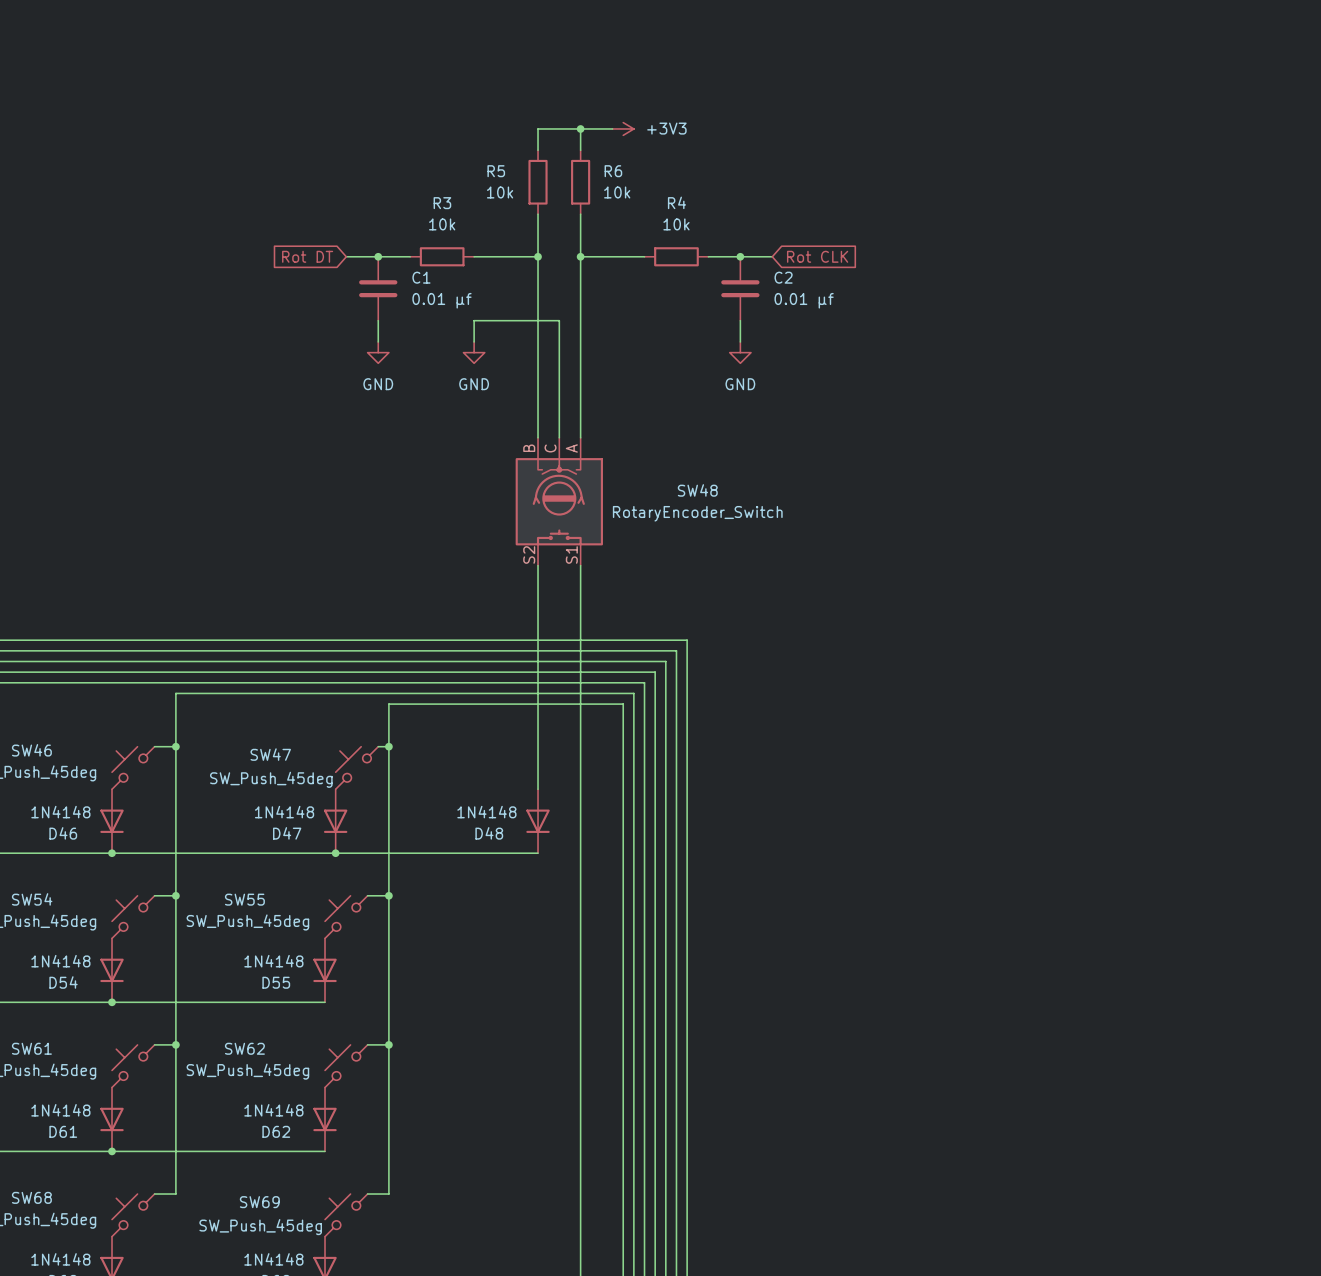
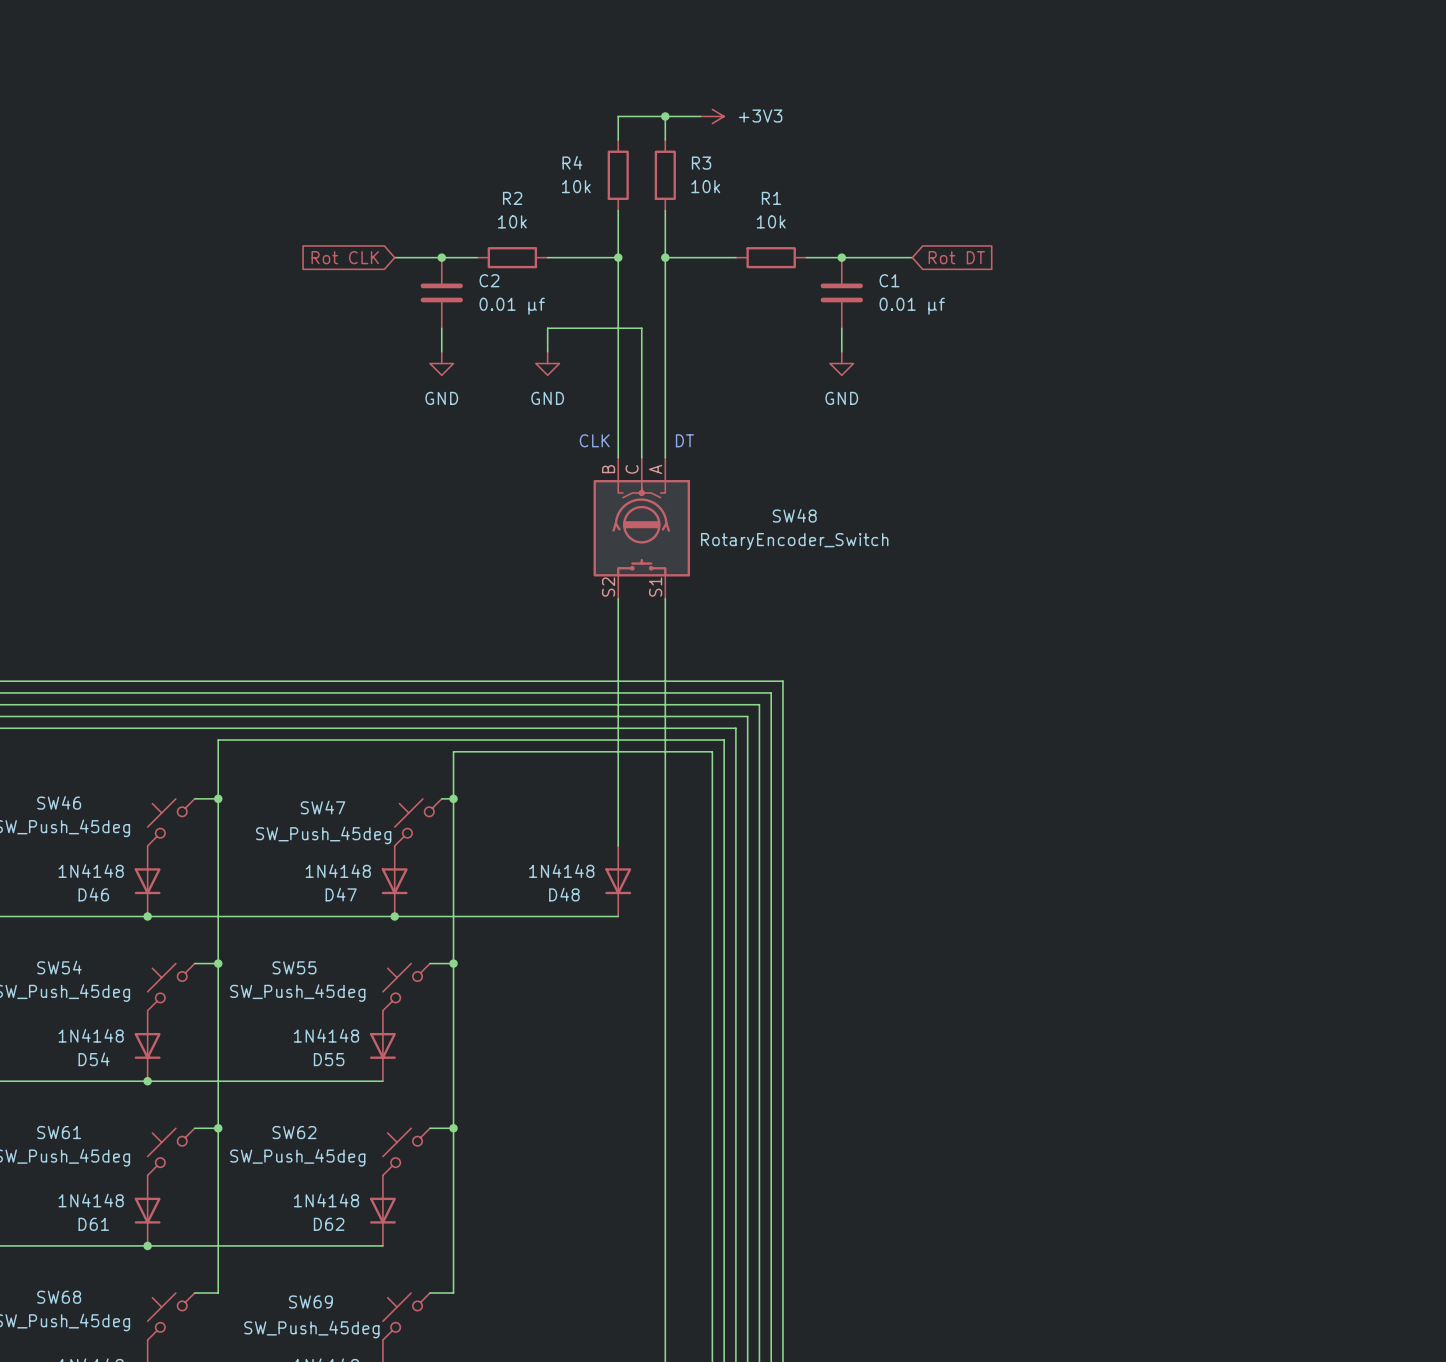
R5 name: R5 (496, 171) -> R4 (572, 162)
R6 name: R6 (613, 171) -> R3 (701, 163)
R4 name: R4 (676, 202) -> R1 (771, 198)
R3 name: R3 (442, 203) -> R2 (512, 198)
global label: Rot DT (307, 256) -> Rot CLK (345, 257)
wire: none -> (394, 257) (406, 257)
wire: none -> (877, 257) (912, 257)
global label: Rot CLK (817, 256) -> Rot DT (956, 257)
C1 name: C1 (421, 277) -> C2 (489, 280)
C2 name: C2 (783, 277) -> C1 (889, 280)
text: none -> CLK (594, 440)
text: none -> DT (684, 440)

